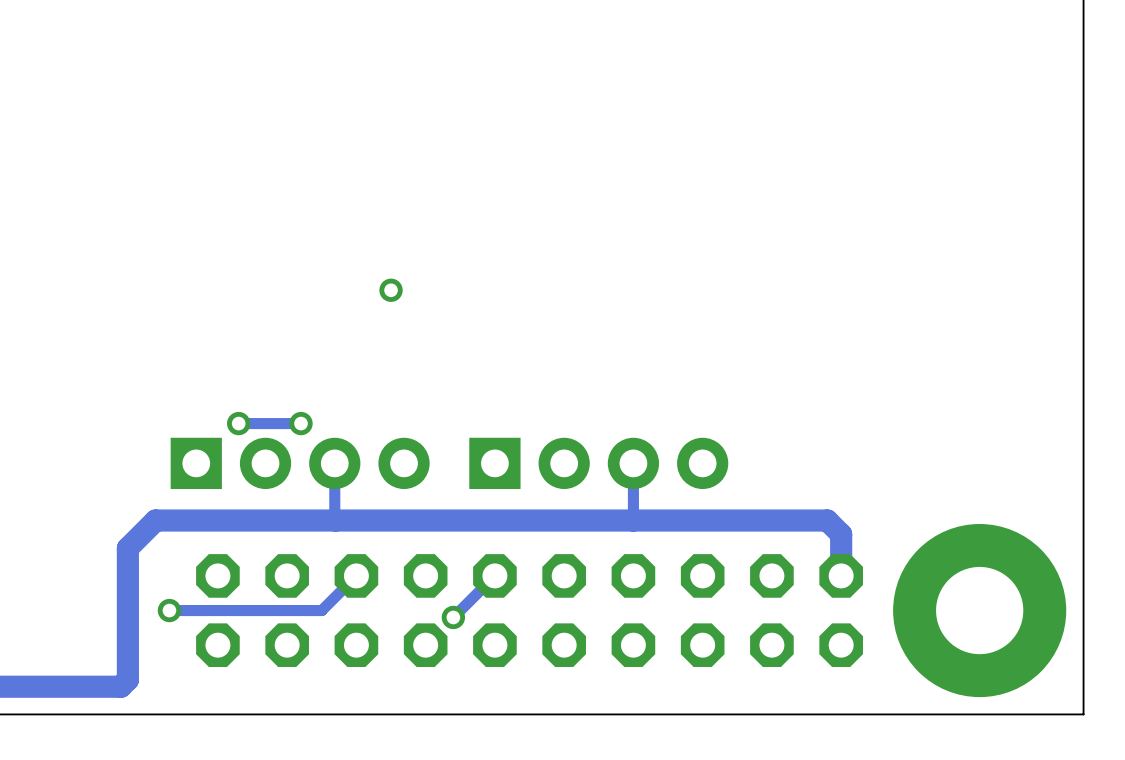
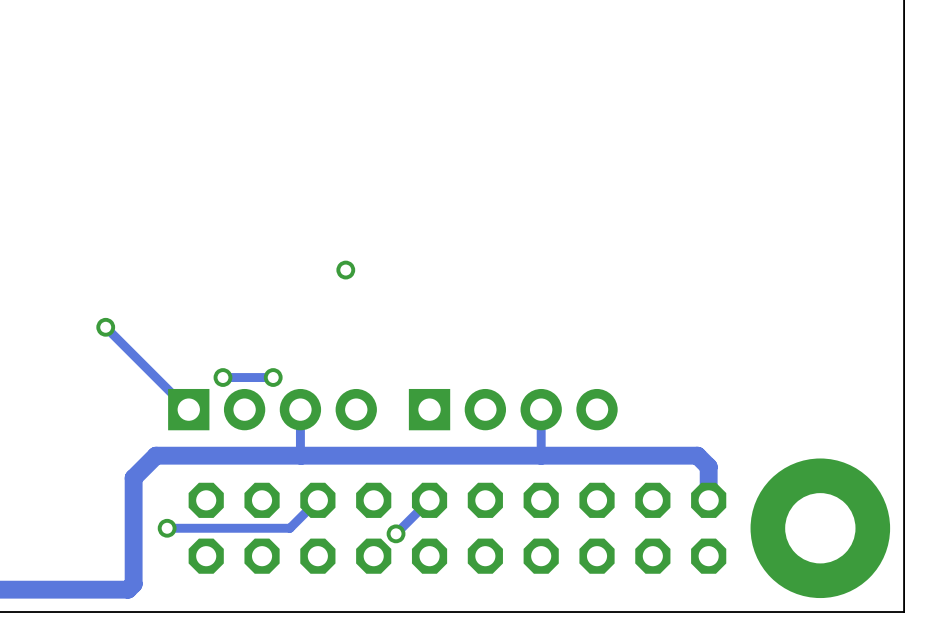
track: none -> (105, 327) (188, 409)
via: none -> (105, 327)

